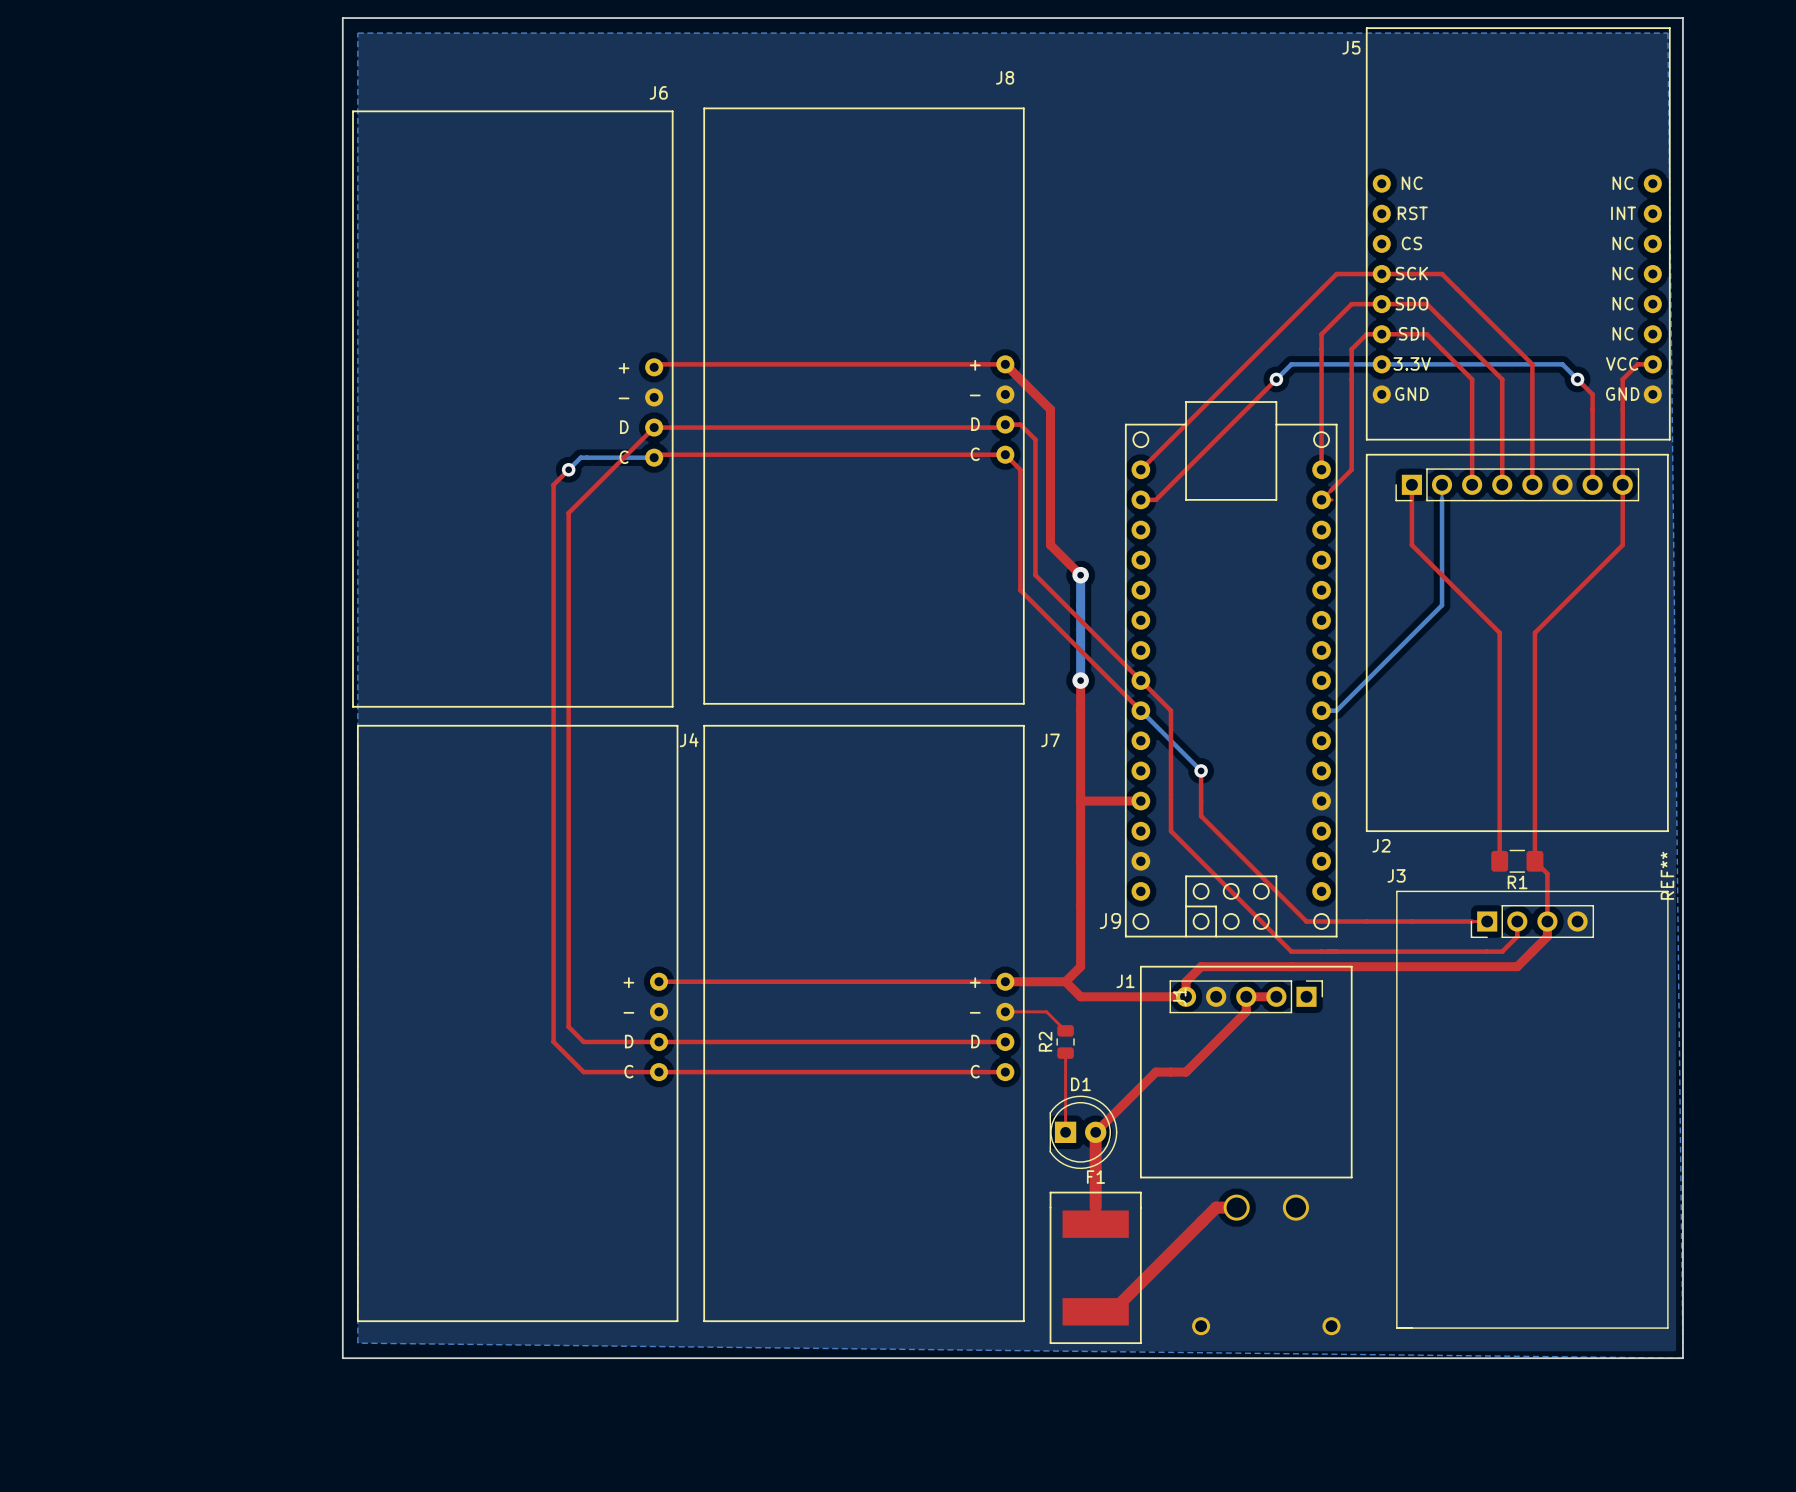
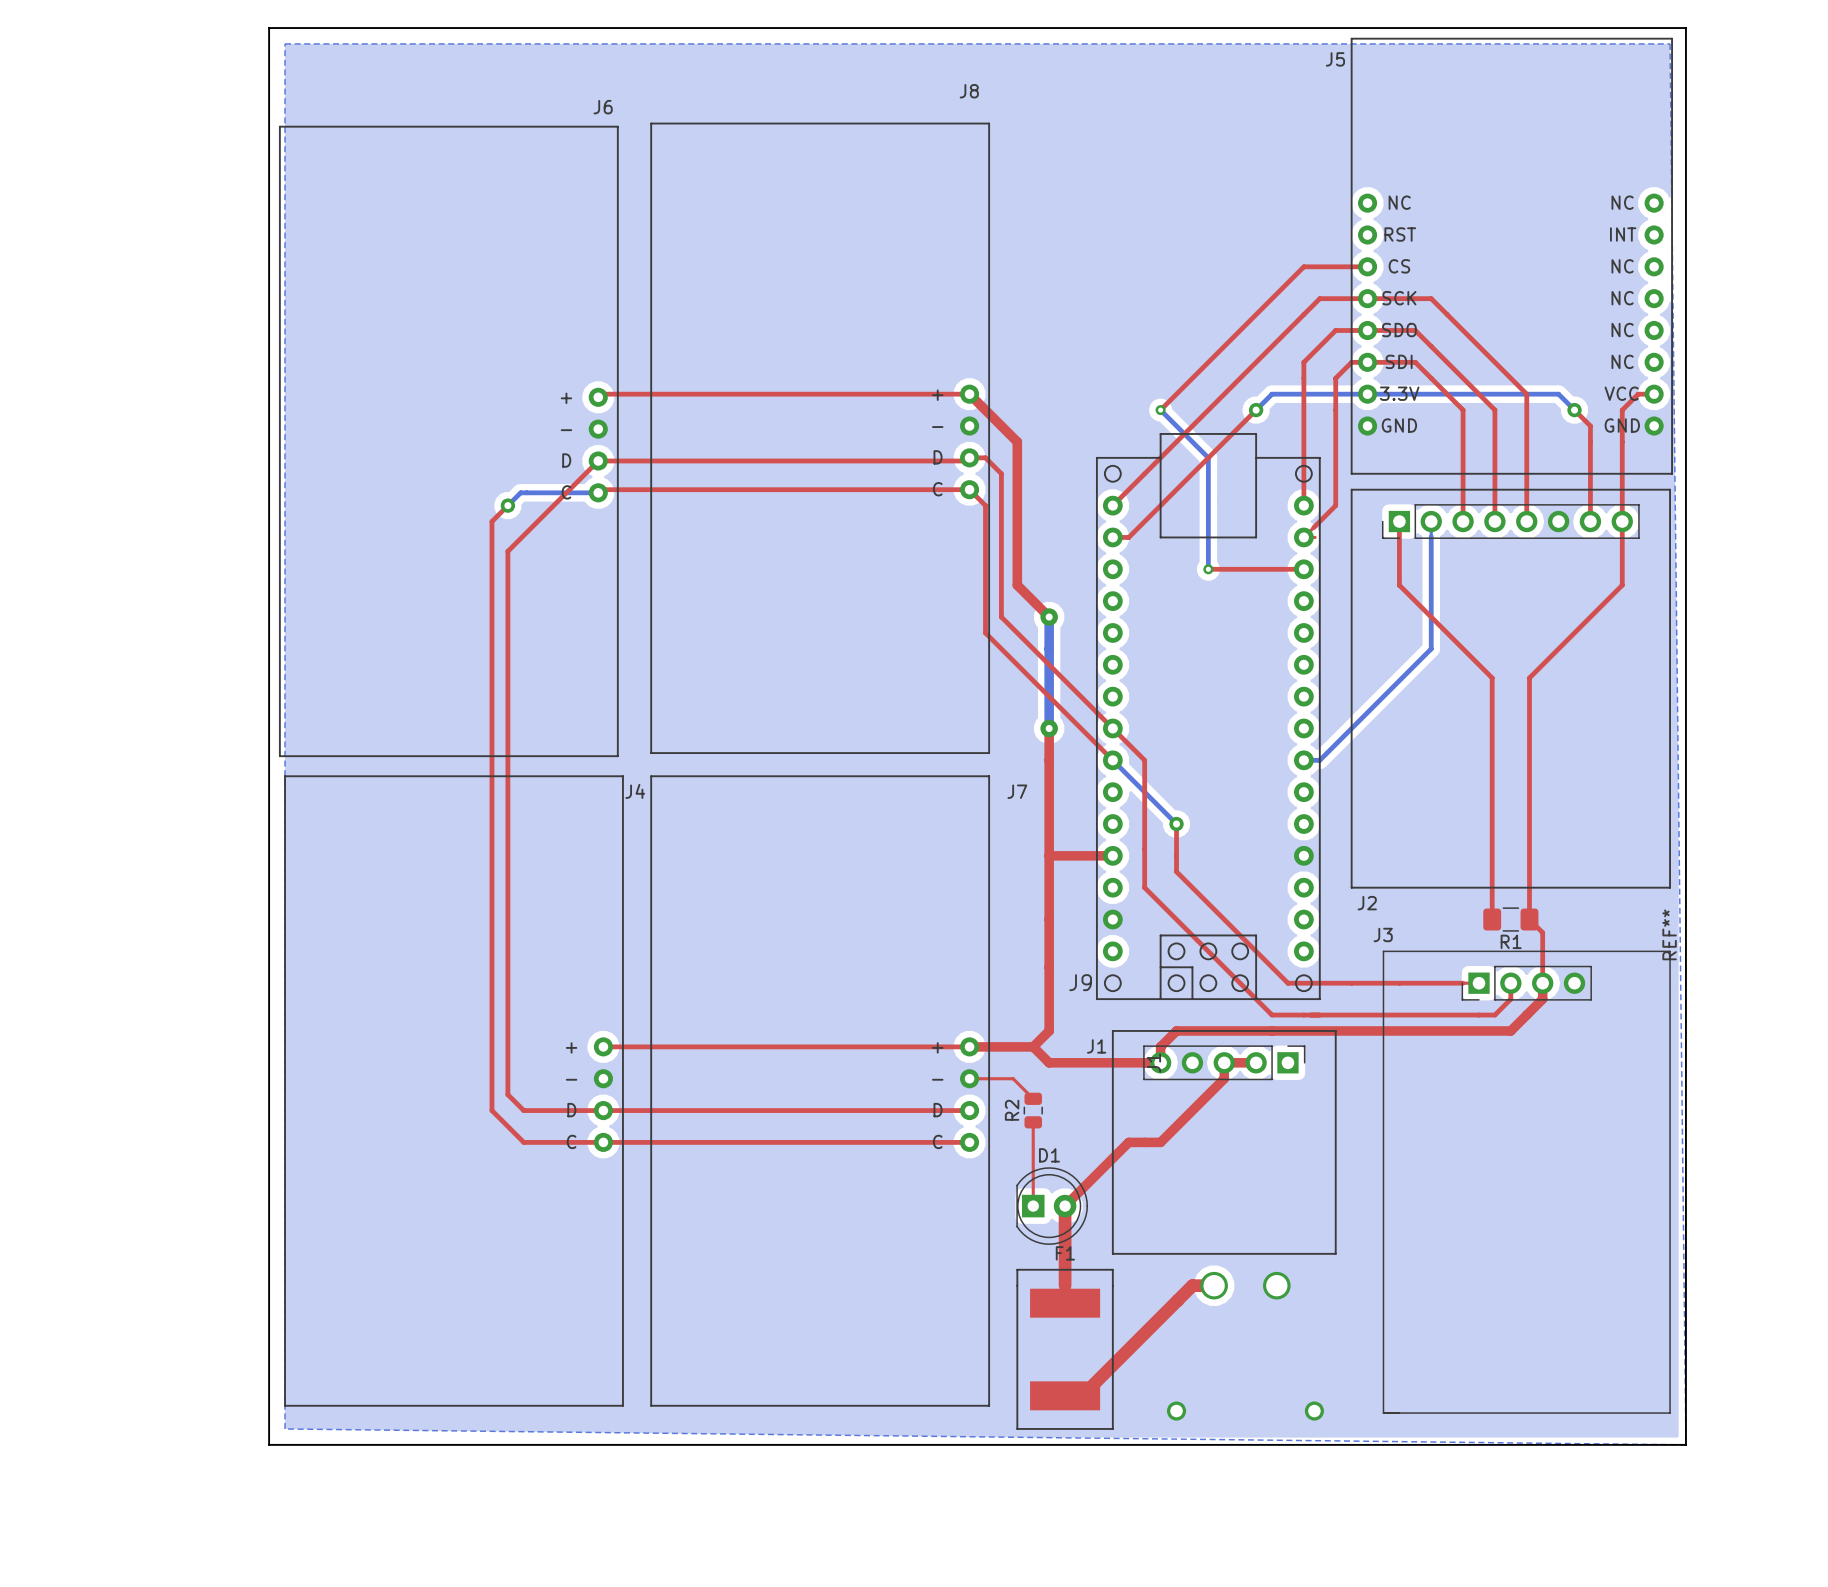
top track: none -> (1367, 266) (1303, 266) (1160, 410)
bottom track: none -> (1160, 410) (1208, 457) (1208, 569)
via: none -> (1160, 410)
top track: none -> (1208, 569) (1303, 569)
via: none -> (1208, 569)

